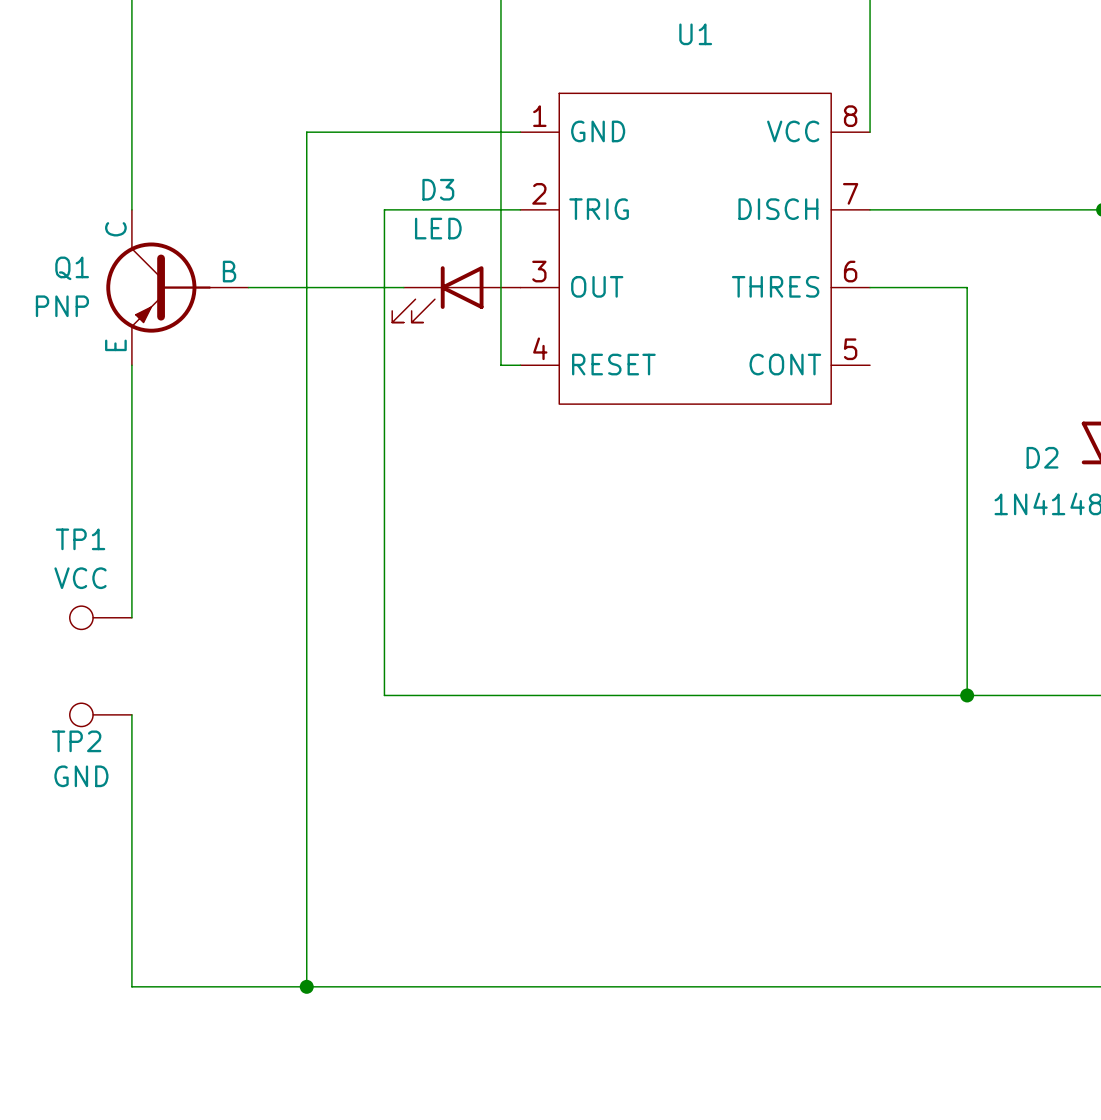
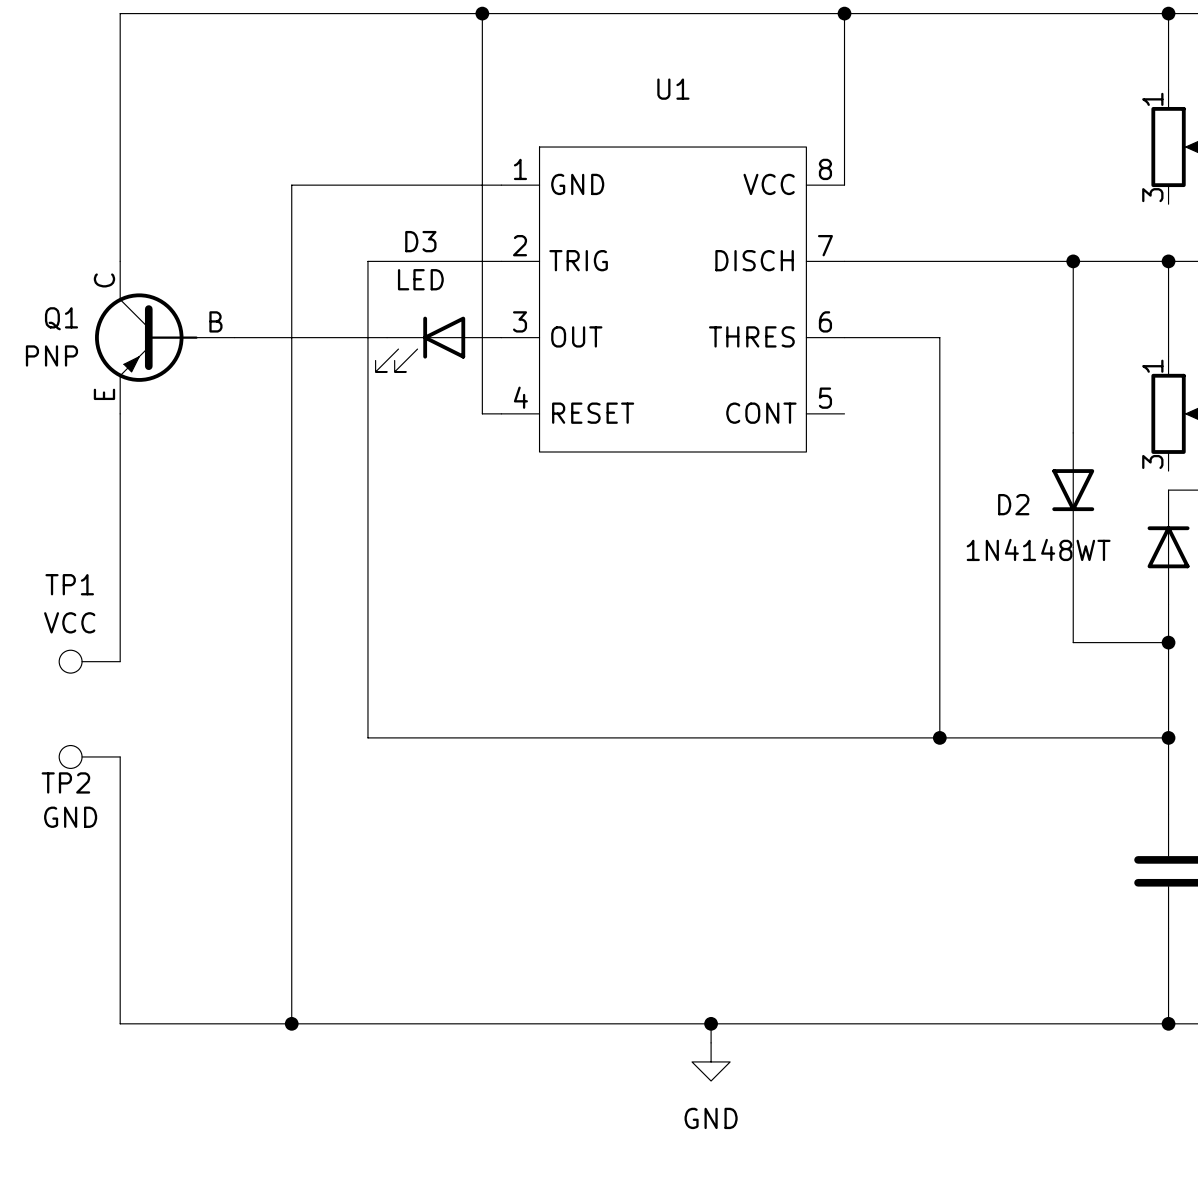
wire: none -> (711, 1023) (711, 1042)
junction: none -> (711, 1023)
power symbol: none -> GND (711, 1061)

